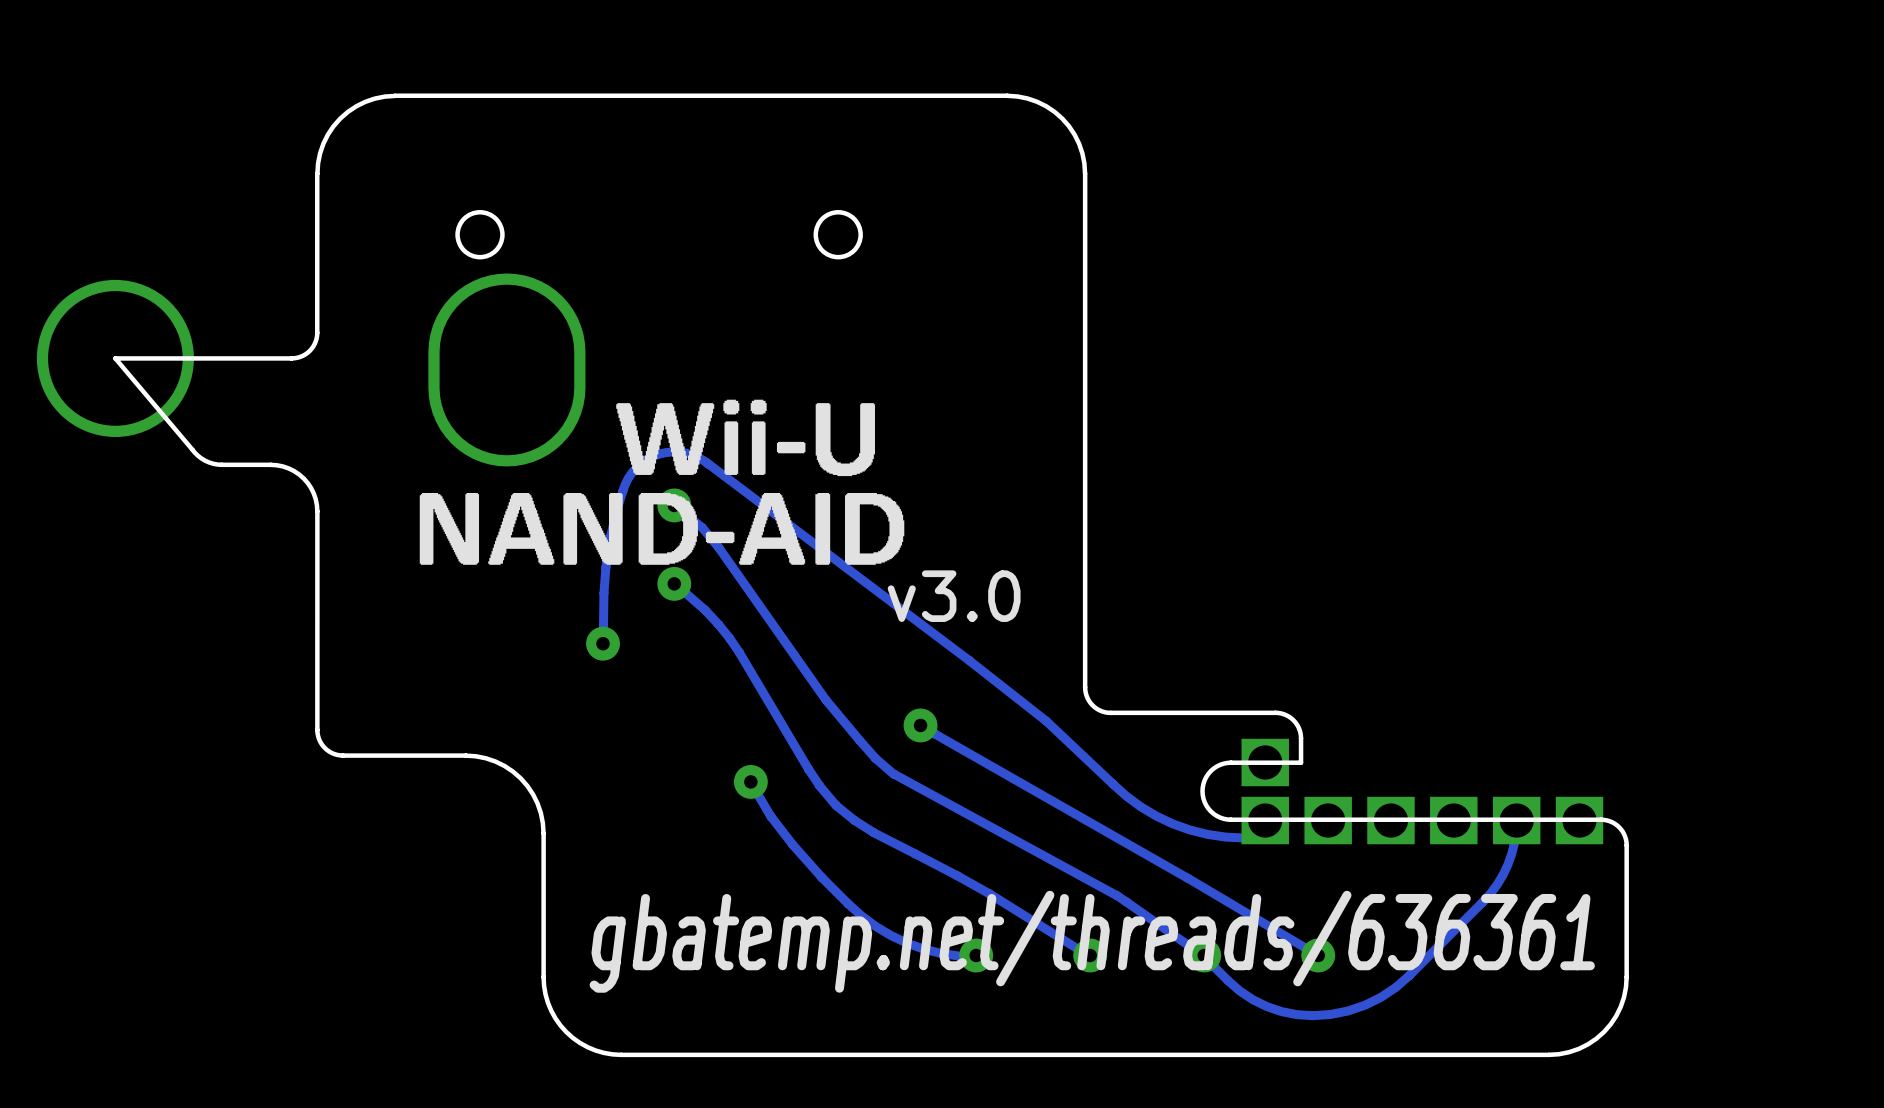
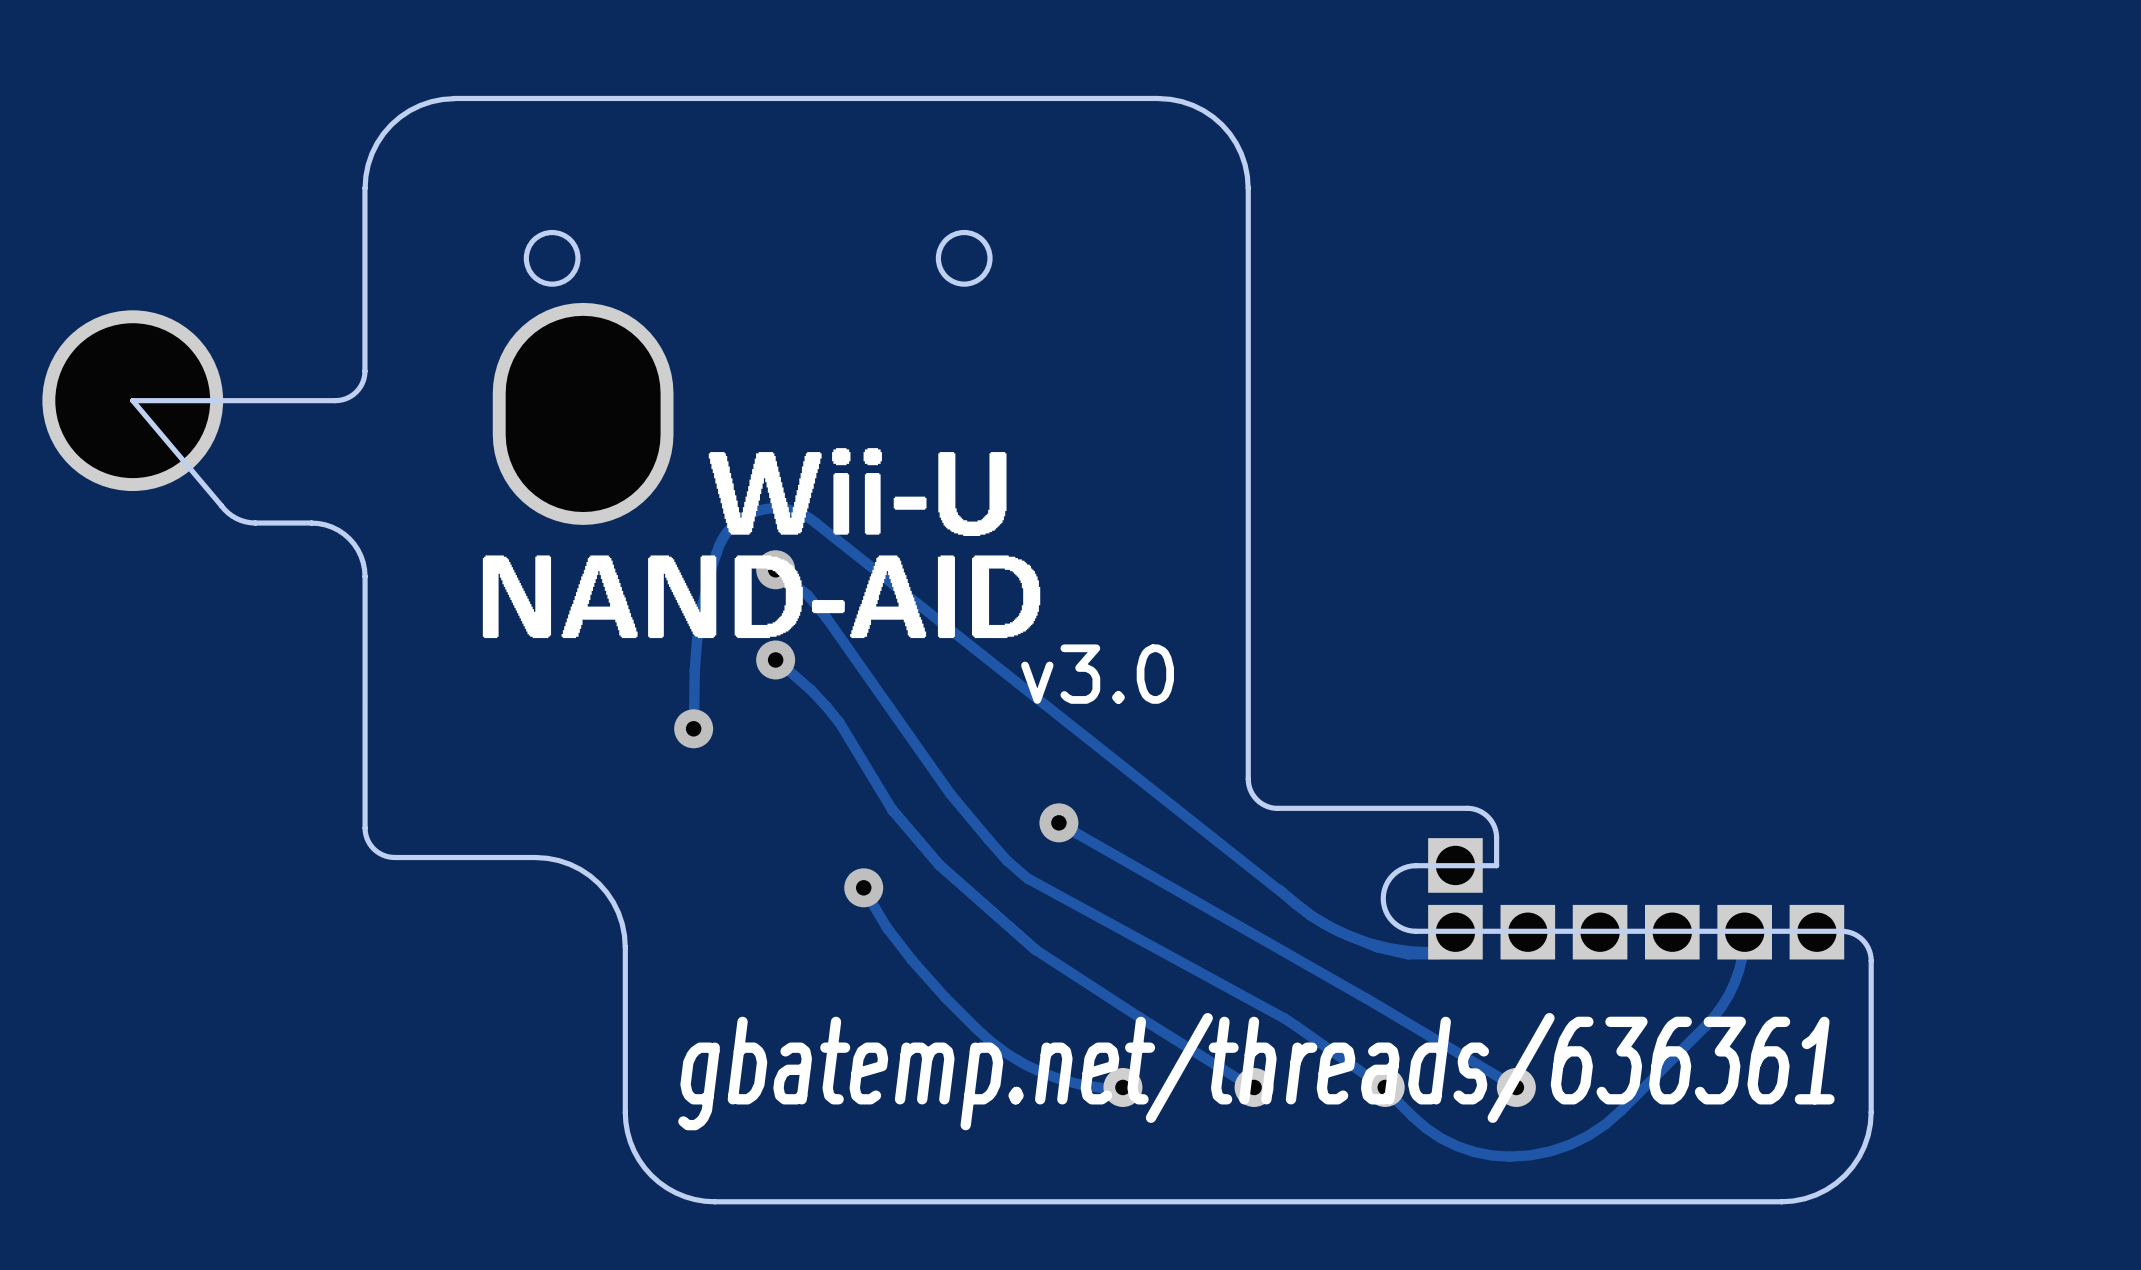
track: (706, 462) (969, 660) (1046, 721) (1112, 784) -> none
track: none -> (815, 522) (1311, 915) (1339, 931) (1376, 947) (1408, 954) (1438, 954)
track: (729, 638) (808, 769) (836, 805) (873, 832) (989, 893) -> (839, 722) (892, 809) (939, 865) (1035, 949) (1140, 1017)

